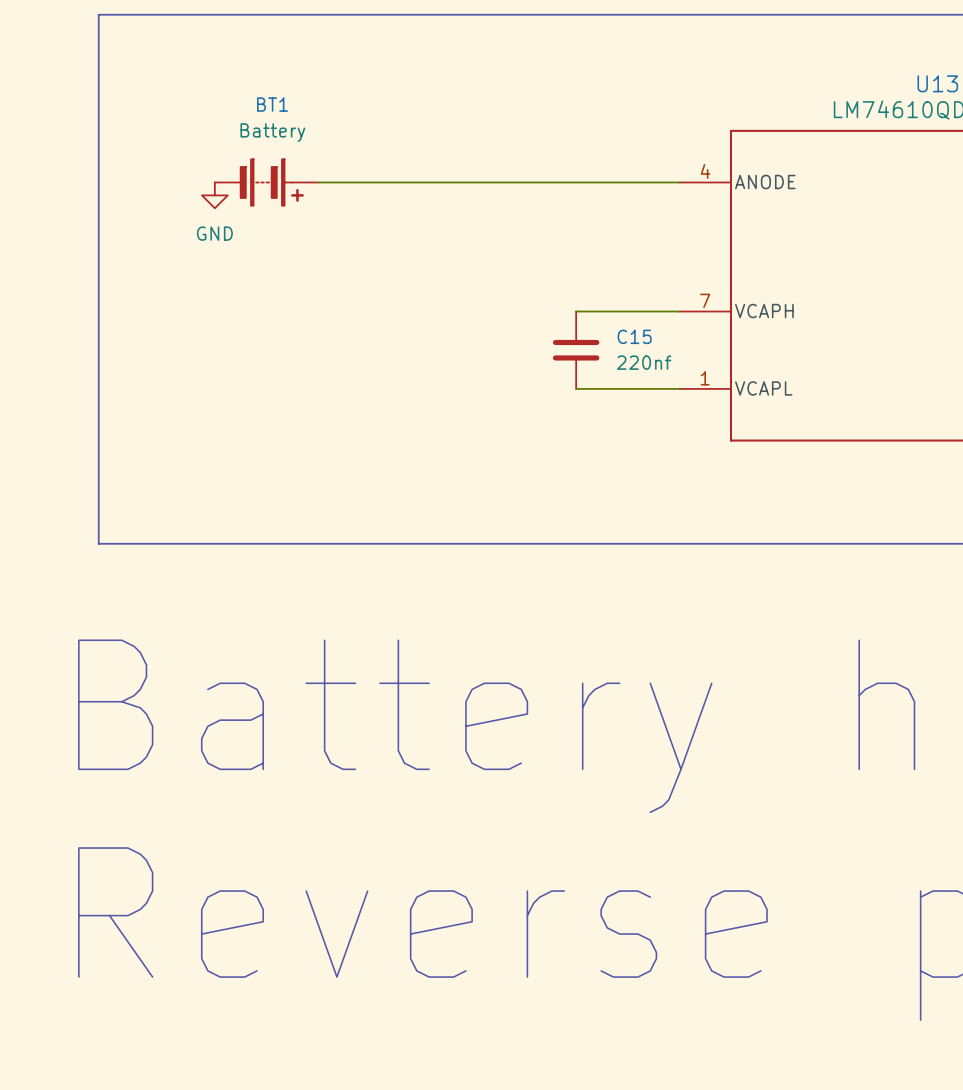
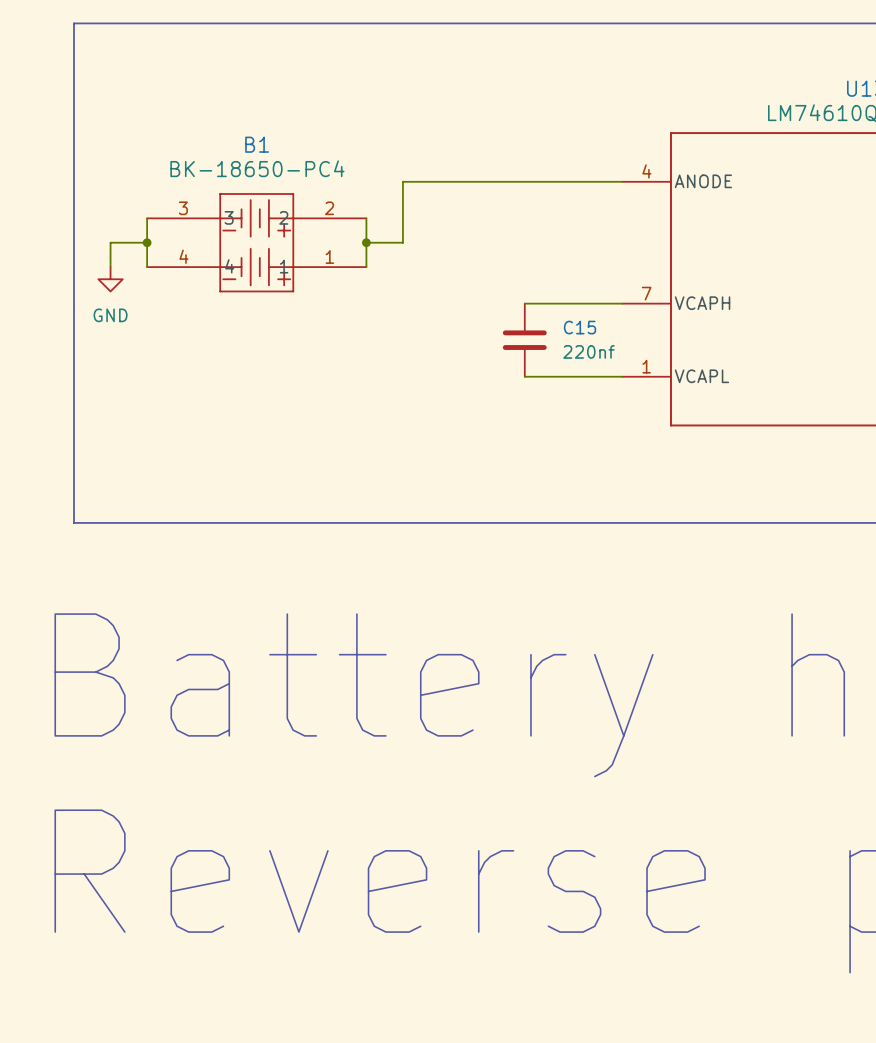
BT1: Battery (266, 182) -> none
wire: (318, 182) (447, 182) -> (366, 242) (402, 242) (402, 181)
power symbol position: GND (214, 195) -> GND (110, 279)
wire: none -> (147, 218) (147, 267)
wire: none -> (366, 218) (366, 267)
wire: none -> (147, 242) (110, 242) (110, 267)
junction: none -> (147, 242)
B1: none -> BK-18650-PC4 (256, 242)
junction: none -> (366, 242)

